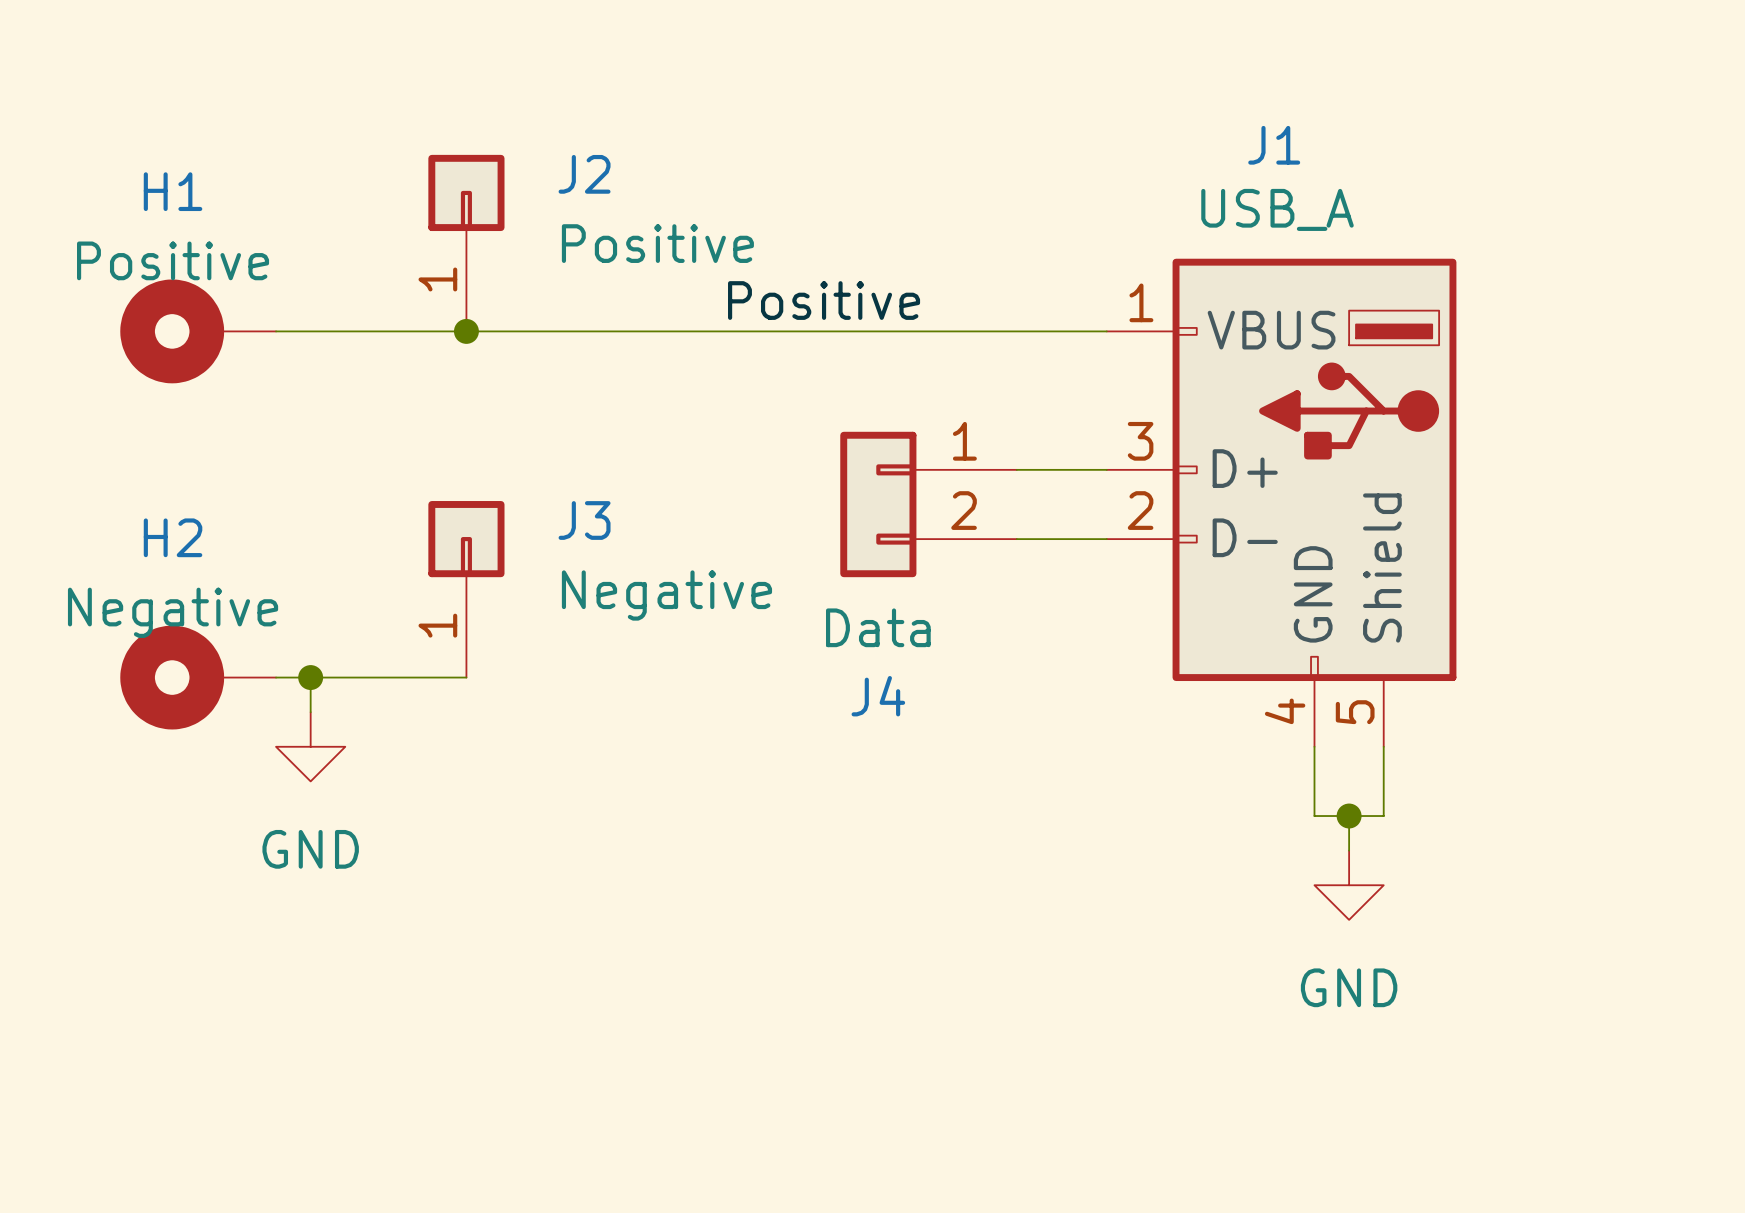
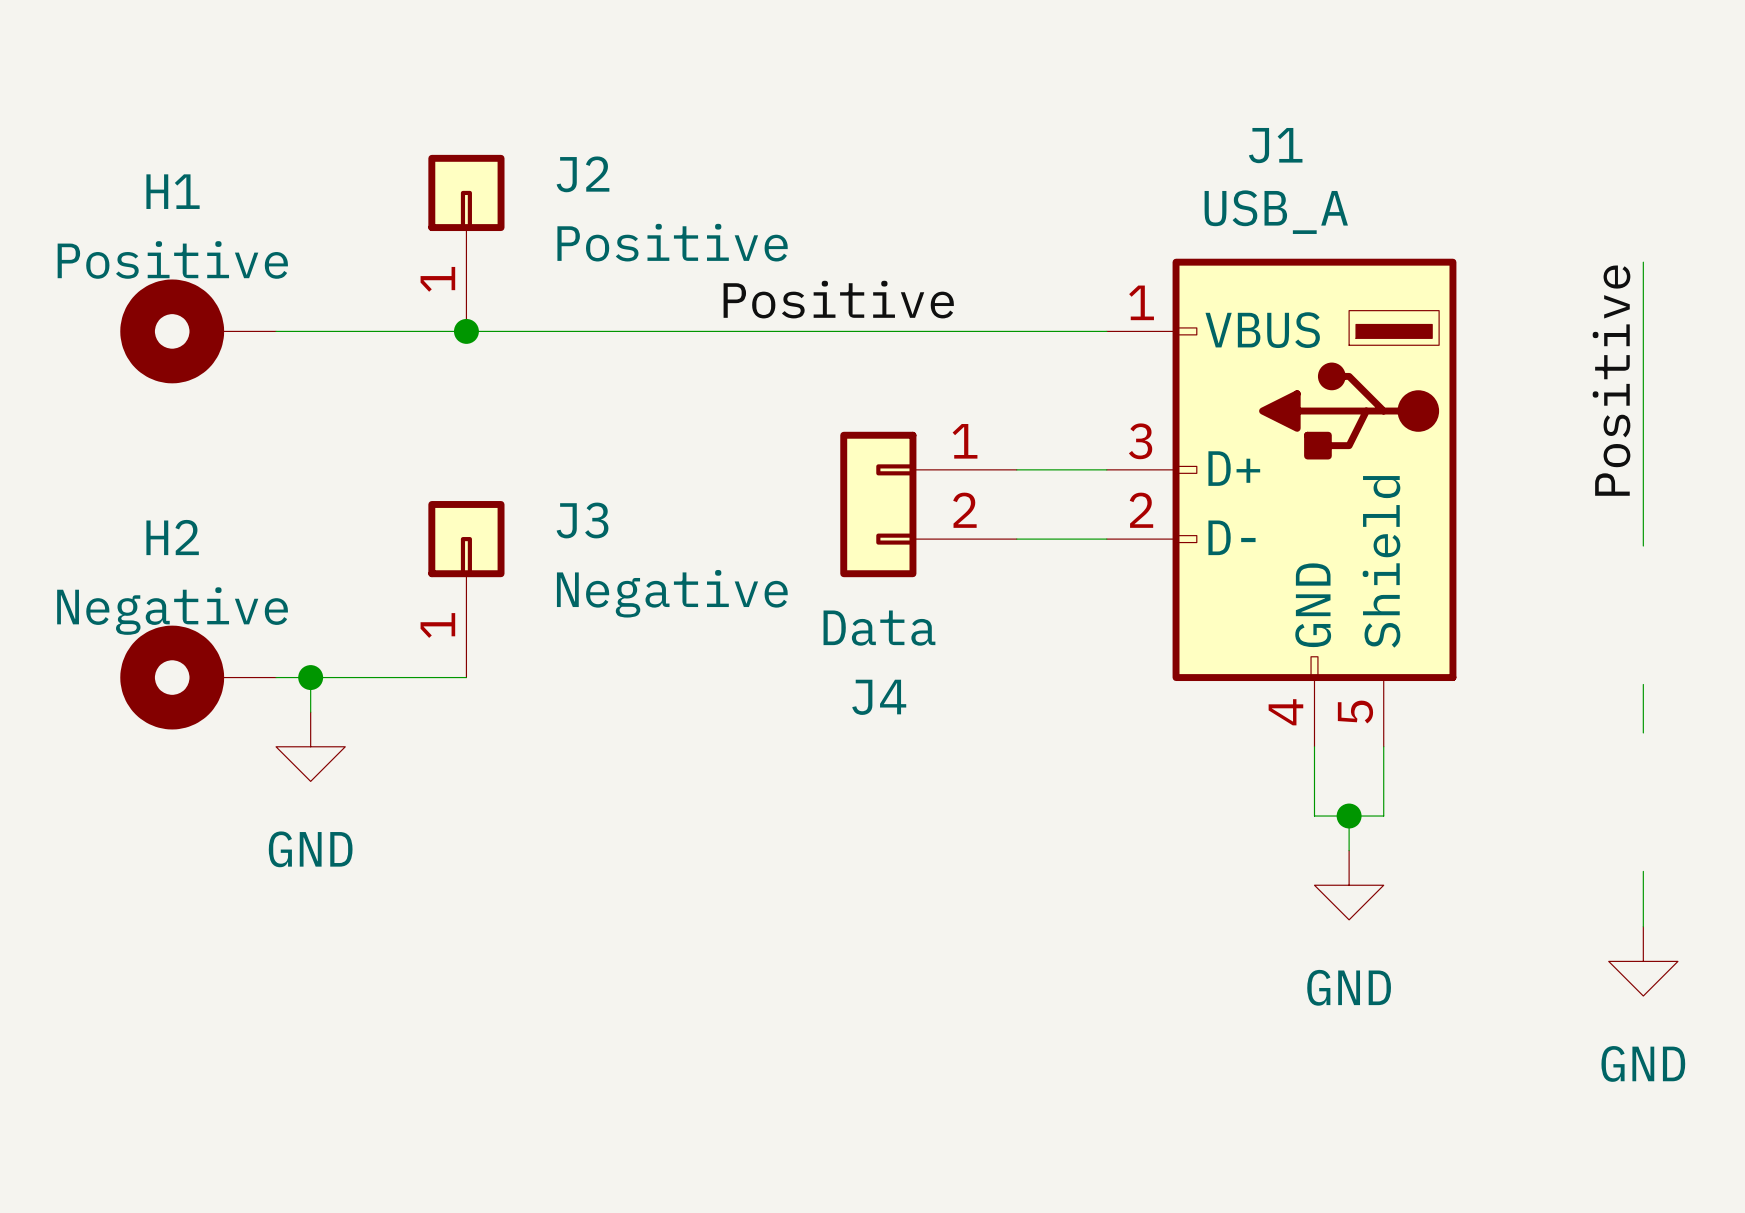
wire: none -> (1643, 262) (1643, 546)
label: none -> Positive (1611, 380)
wire: none -> (1643, 684) (1643, 732)
wire: none -> (1643, 871) (1643, 926)
power symbol: none -> GND (1643, 961)

